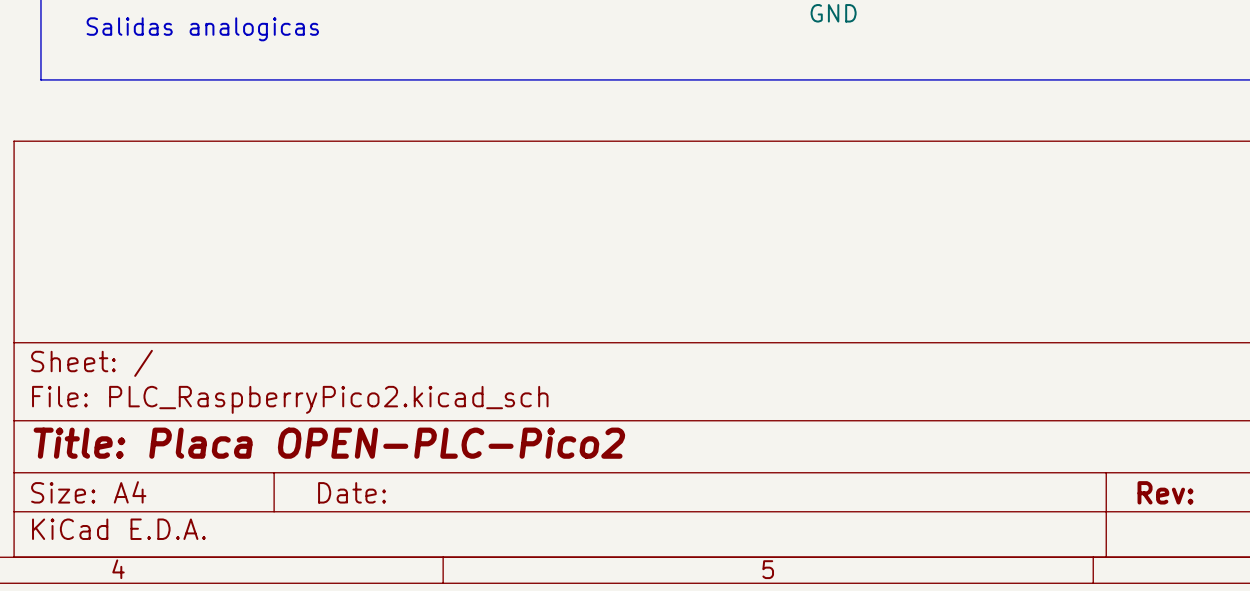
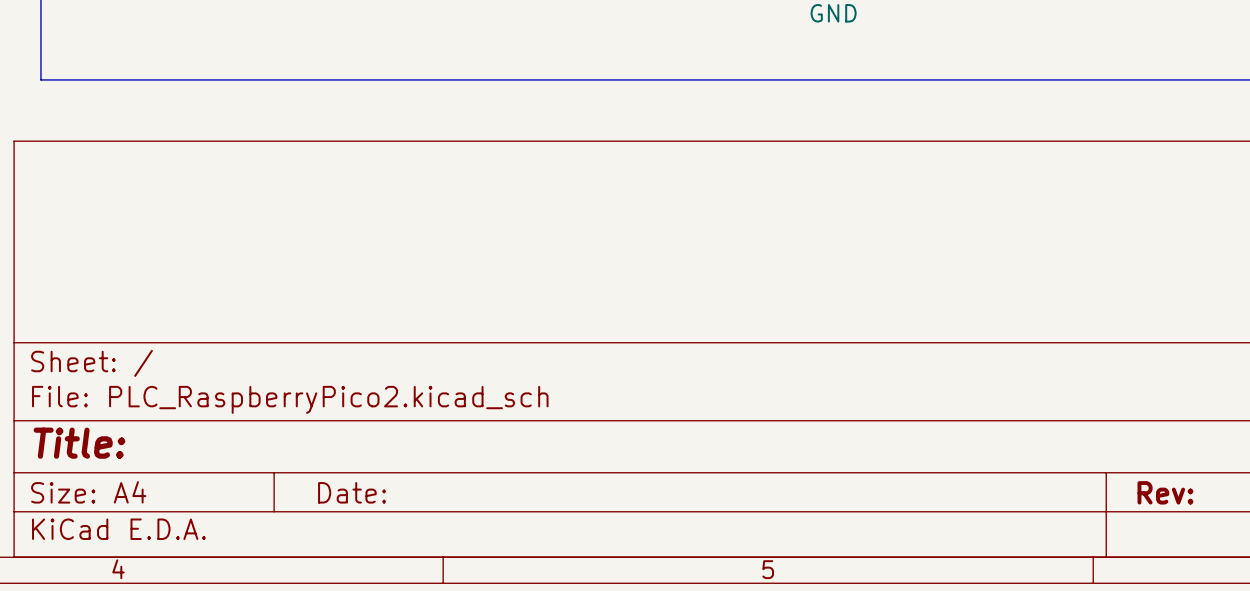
text: Salidas analogicas (202, 29) -> none
title block: Title: Placa OPEN-PLC-Pico2 (329, 443) -> Title: (79, 443)

